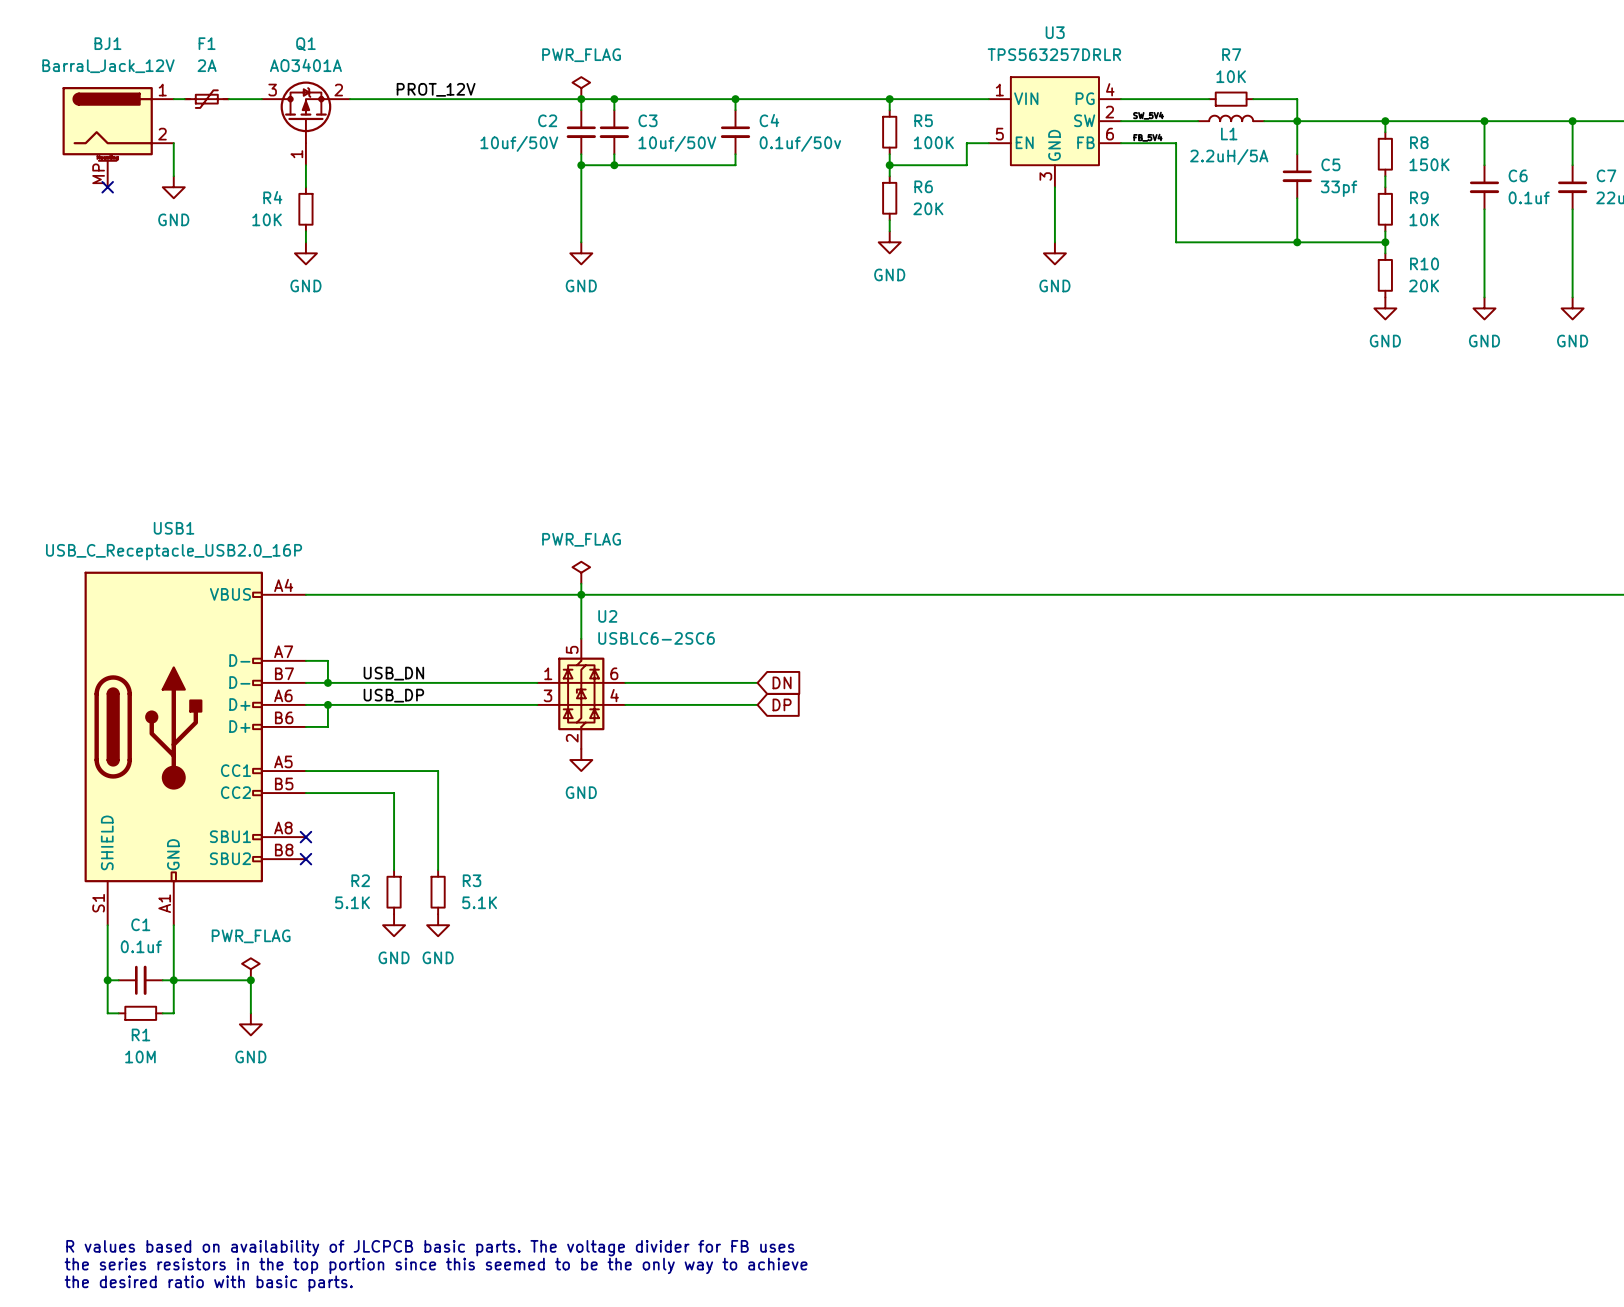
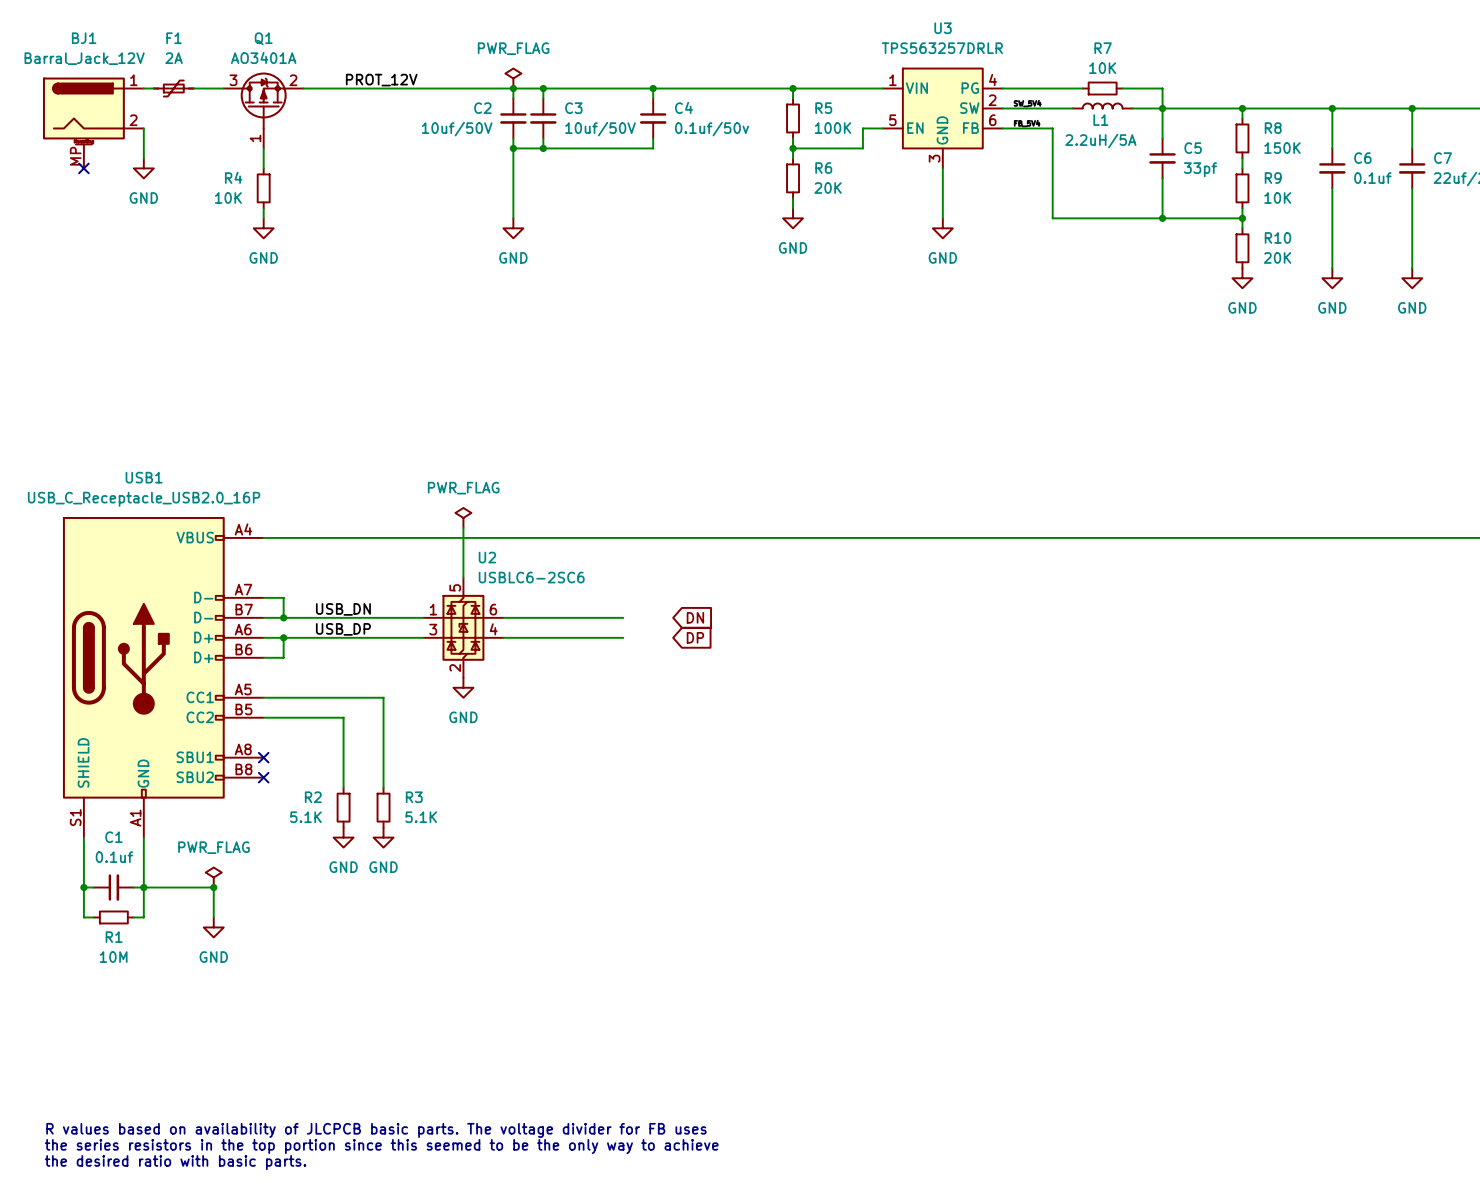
power symbol position: PWR_FLAG (581, 572) -> PWR_FLAG (463, 517)
wire: (581, 583) (581, 638) -> (463, 527) (463, 577)
junction: (581, 594) -> none
wire: (702, 682) (757, 682) -> none
U2 position: (581, 693) -> (463, 627)
wire: (702, 704) (757, 704) -> none
power symbol position: GND (581, 760) -> GND (463, 687)

